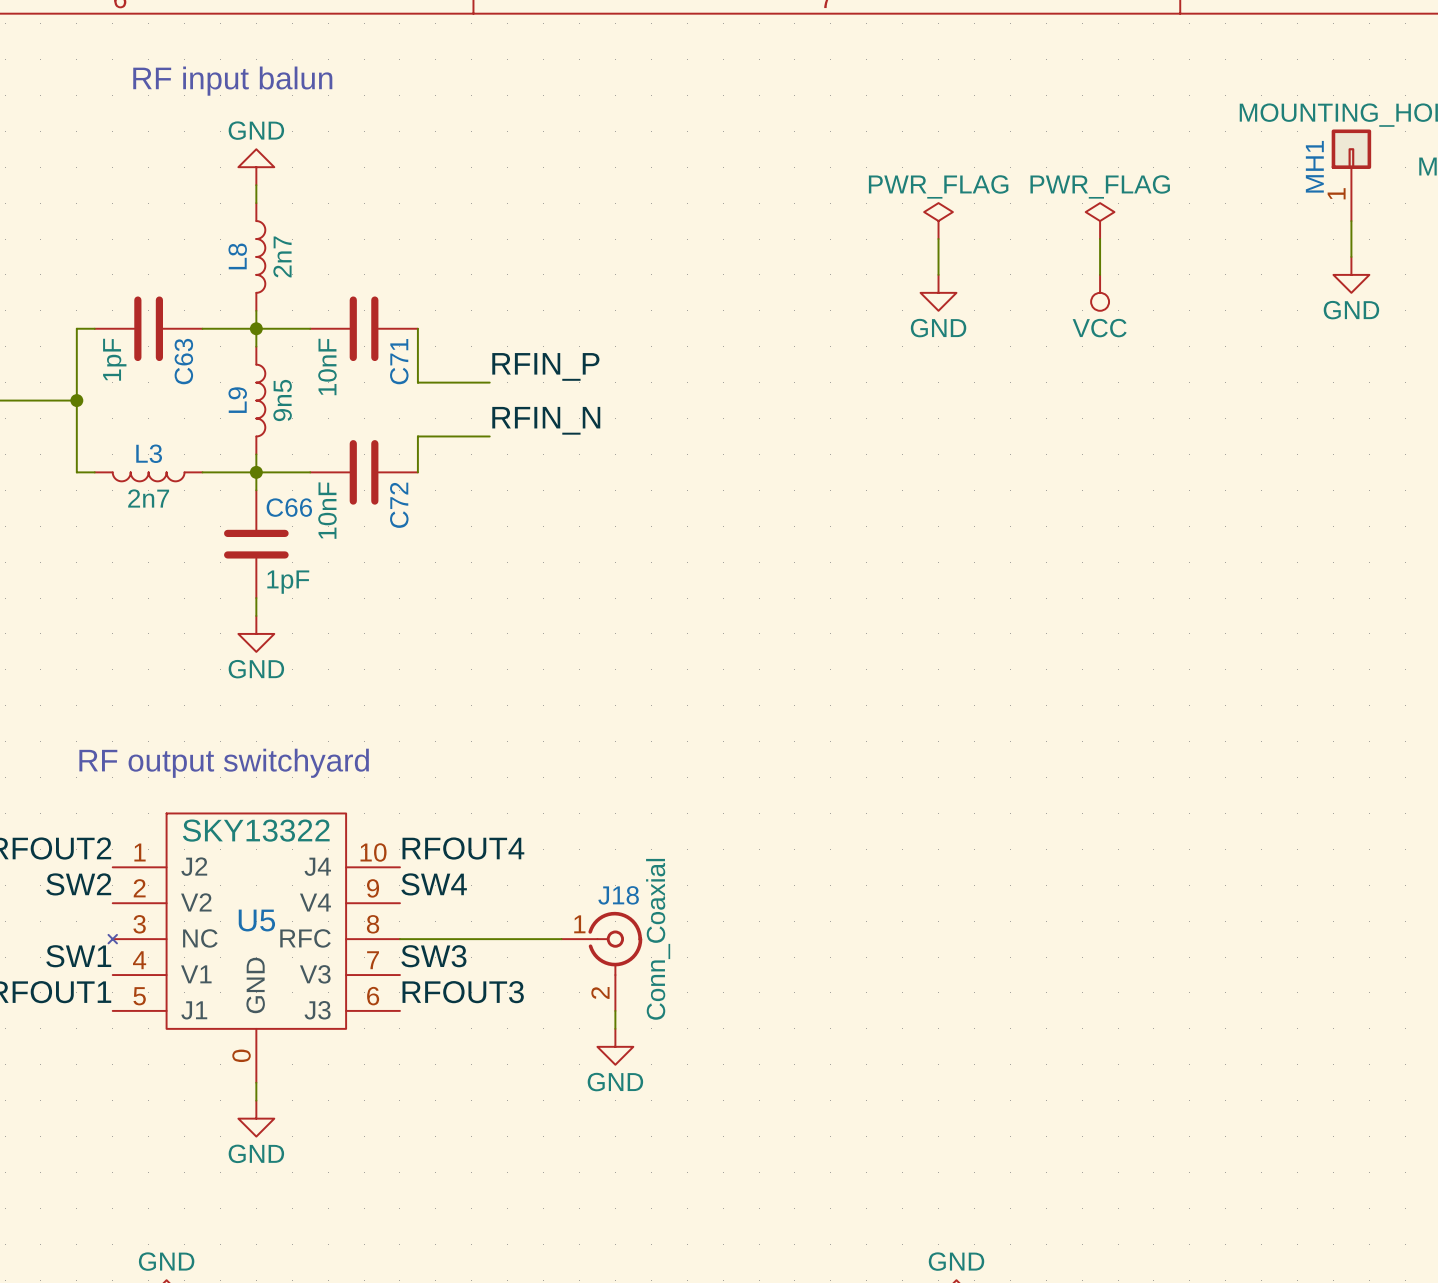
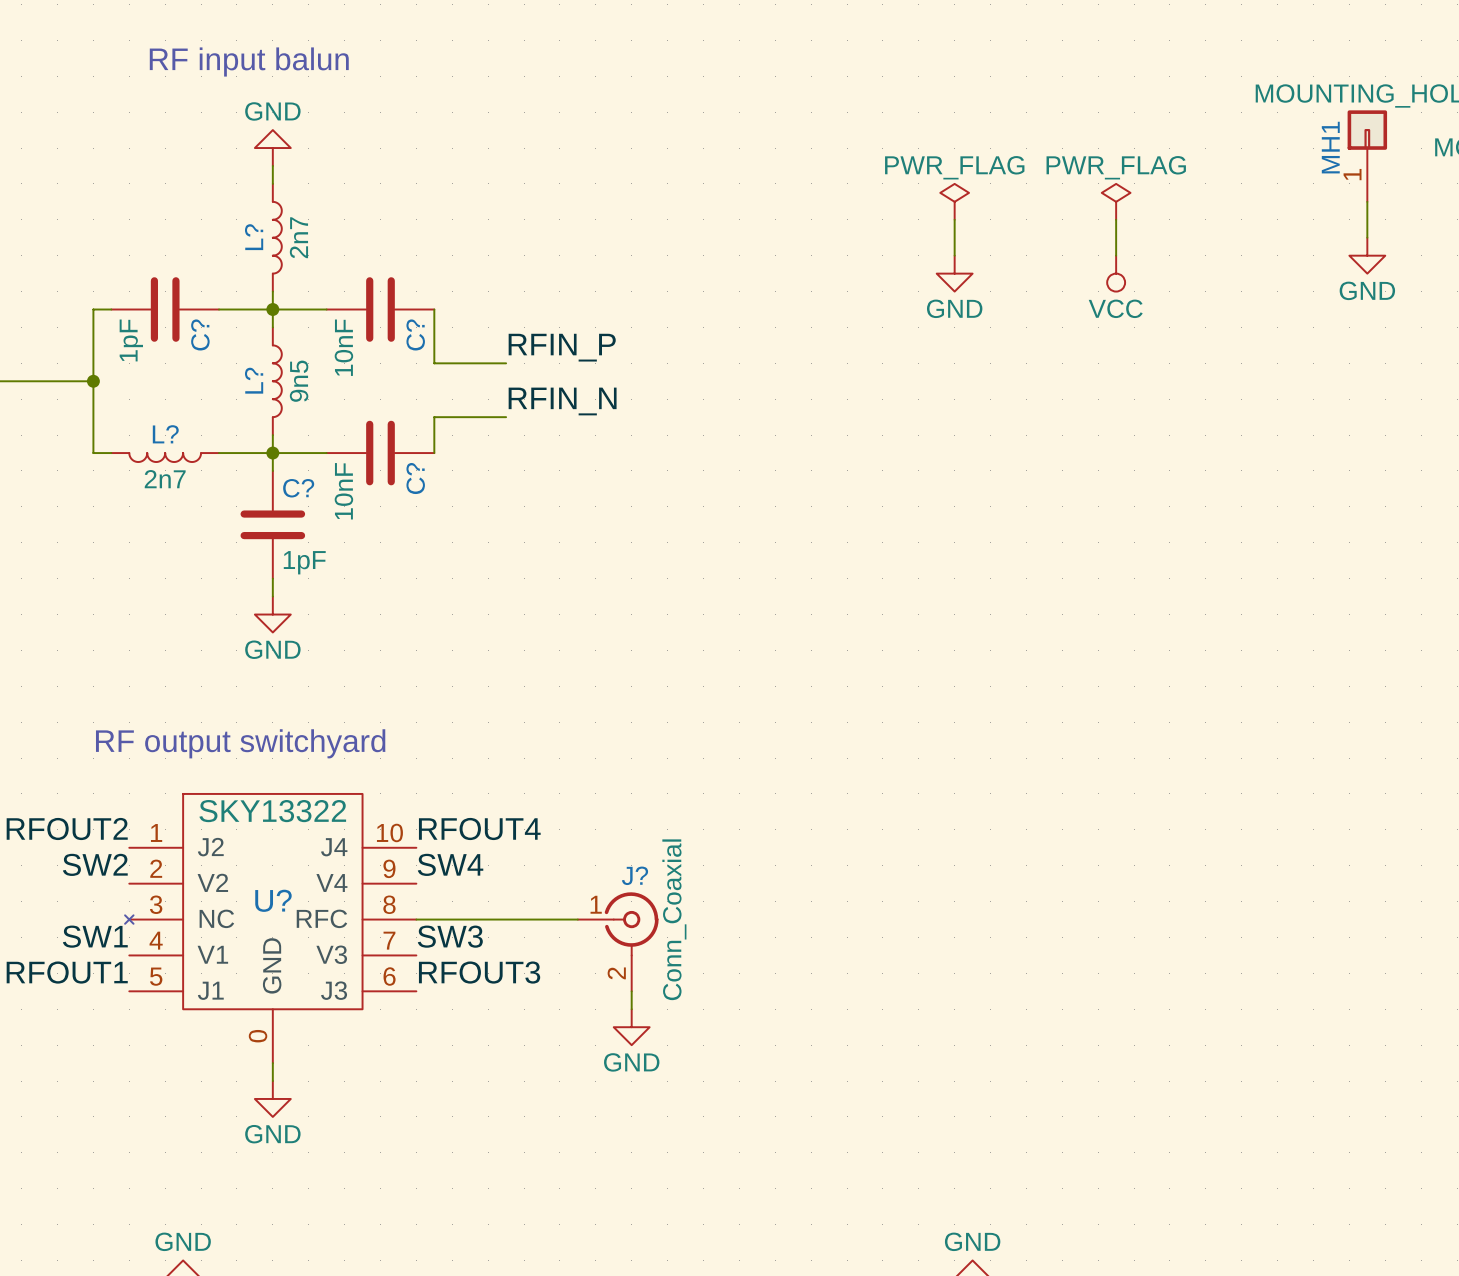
L8 name: L8 (237, 256) -> L? (254, 237)
C63 name: C63 (183, 361) -> C? (200, 334)
C71 name: C71 (399, 361) -> C? (415, 334)
L9 name: L9 (237, 400) -> L? (254, 380)
L3 name: L3 (149, 453) -> L? (165, 434)
C72 name: C72 (399, 505) -> C? (415, 478)
C66 name: C66 (289, 507) -> C? (298, 488)
J18 name: J18 (618, 895) -> J? (634, 875)
U5 name: U5 (256, 920) -> U? (273, 900)

